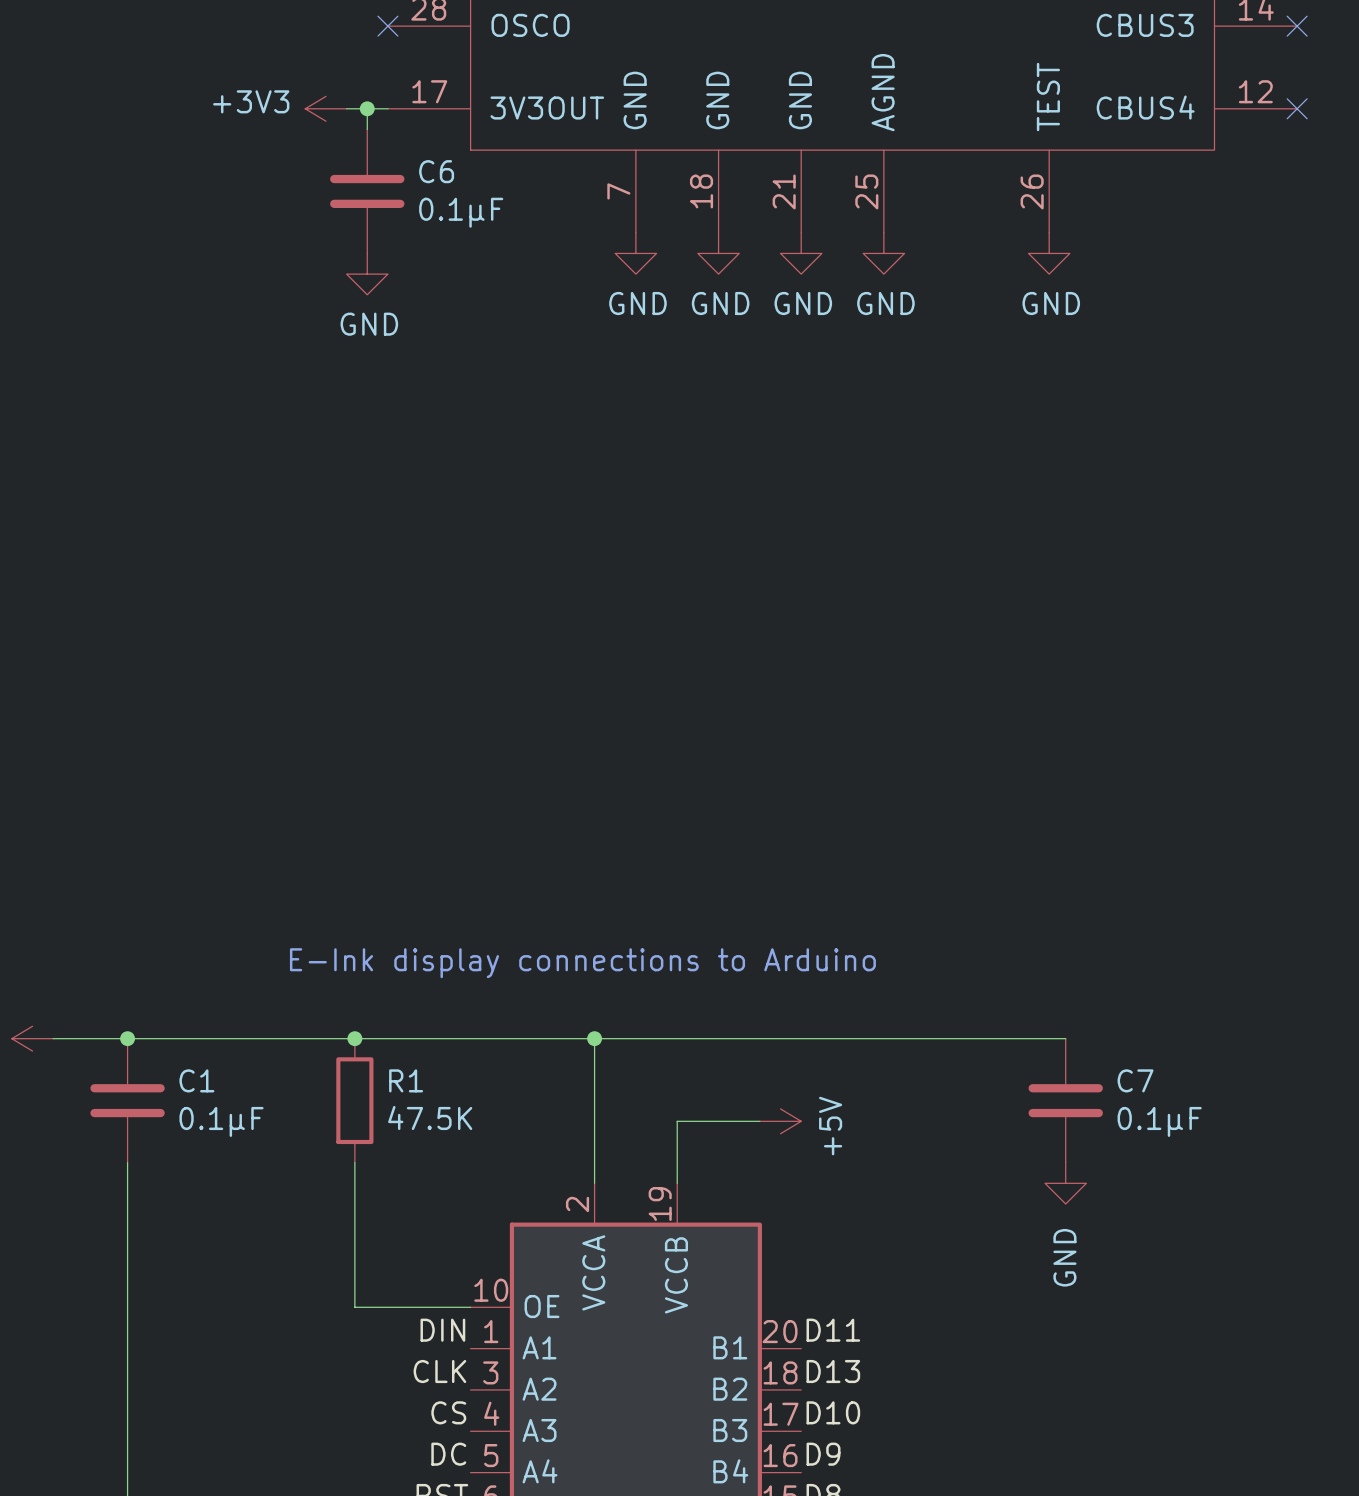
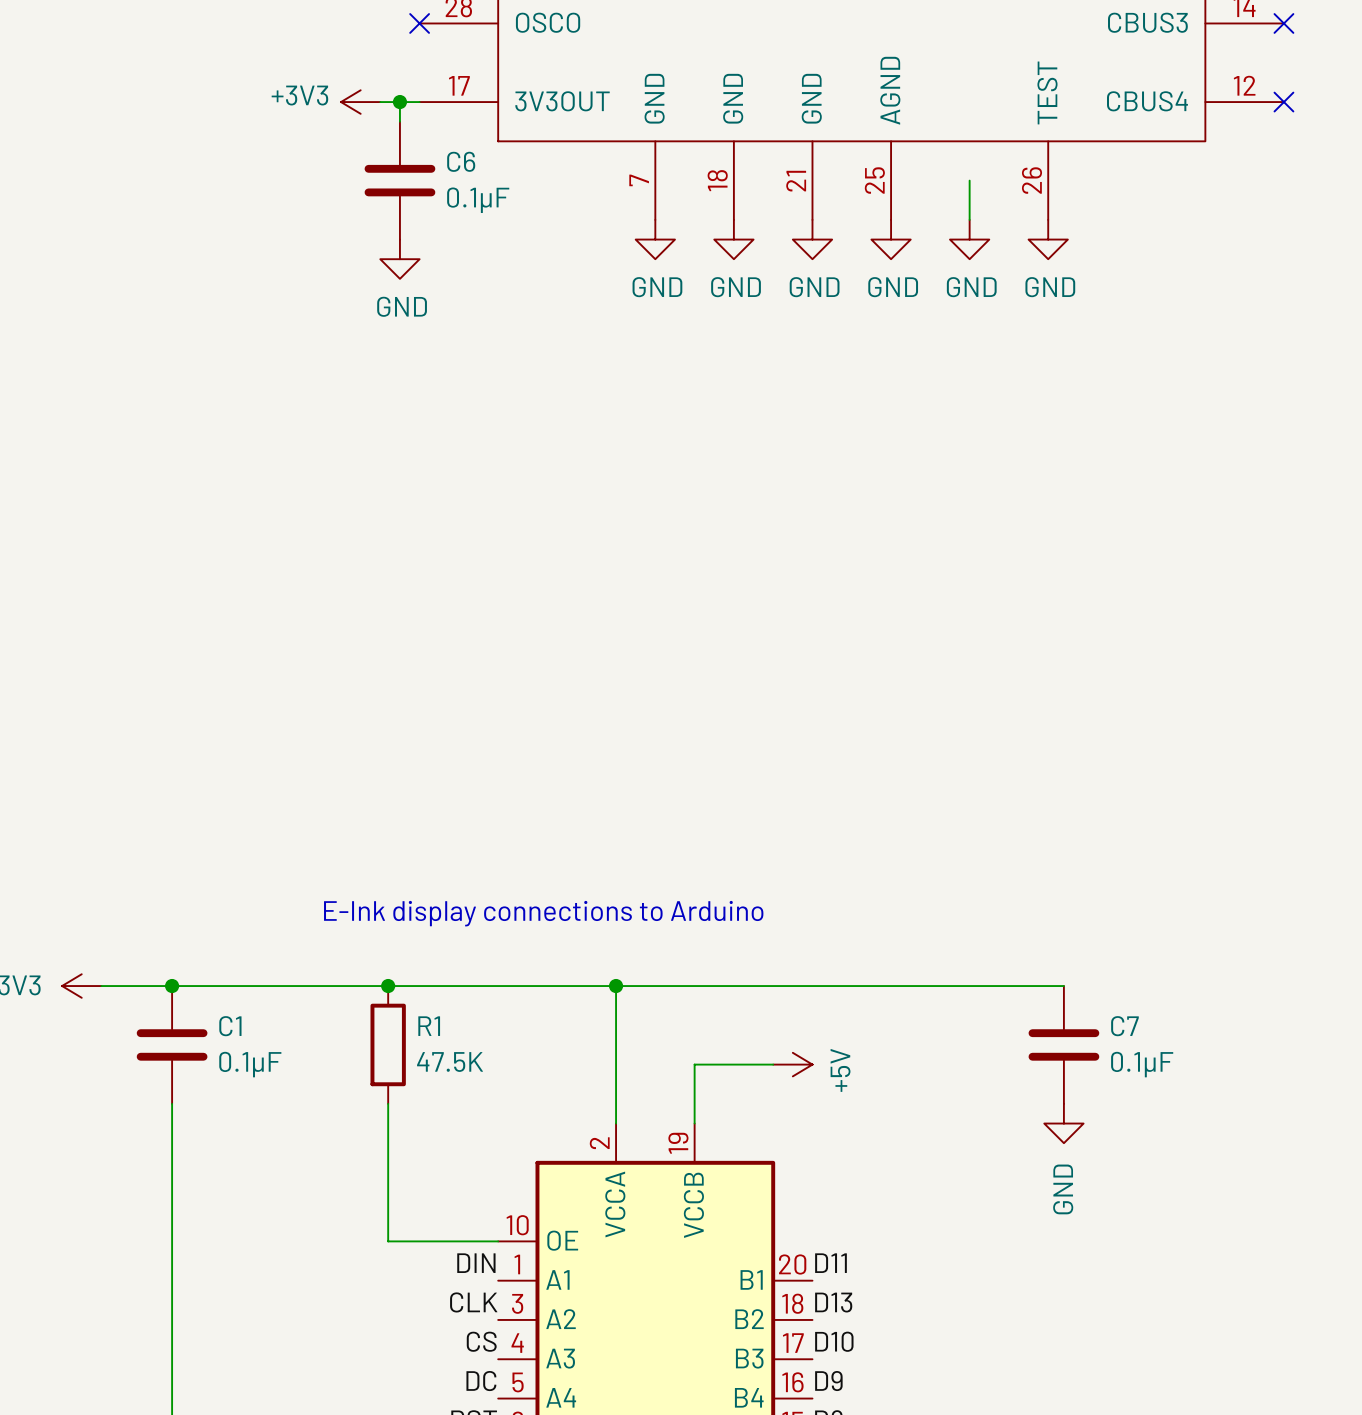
wire: none -> (969, 180) (969, 219)
power symbol: none -> GND (969, 239)

